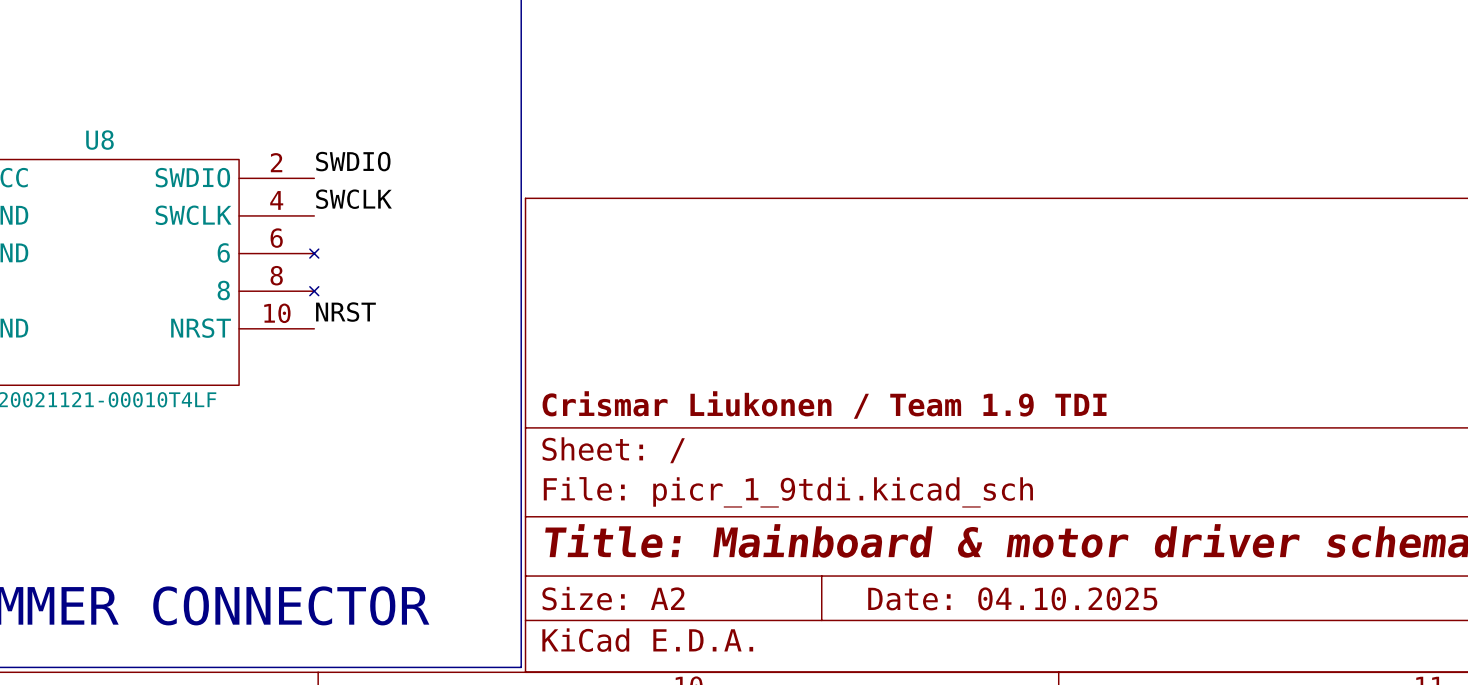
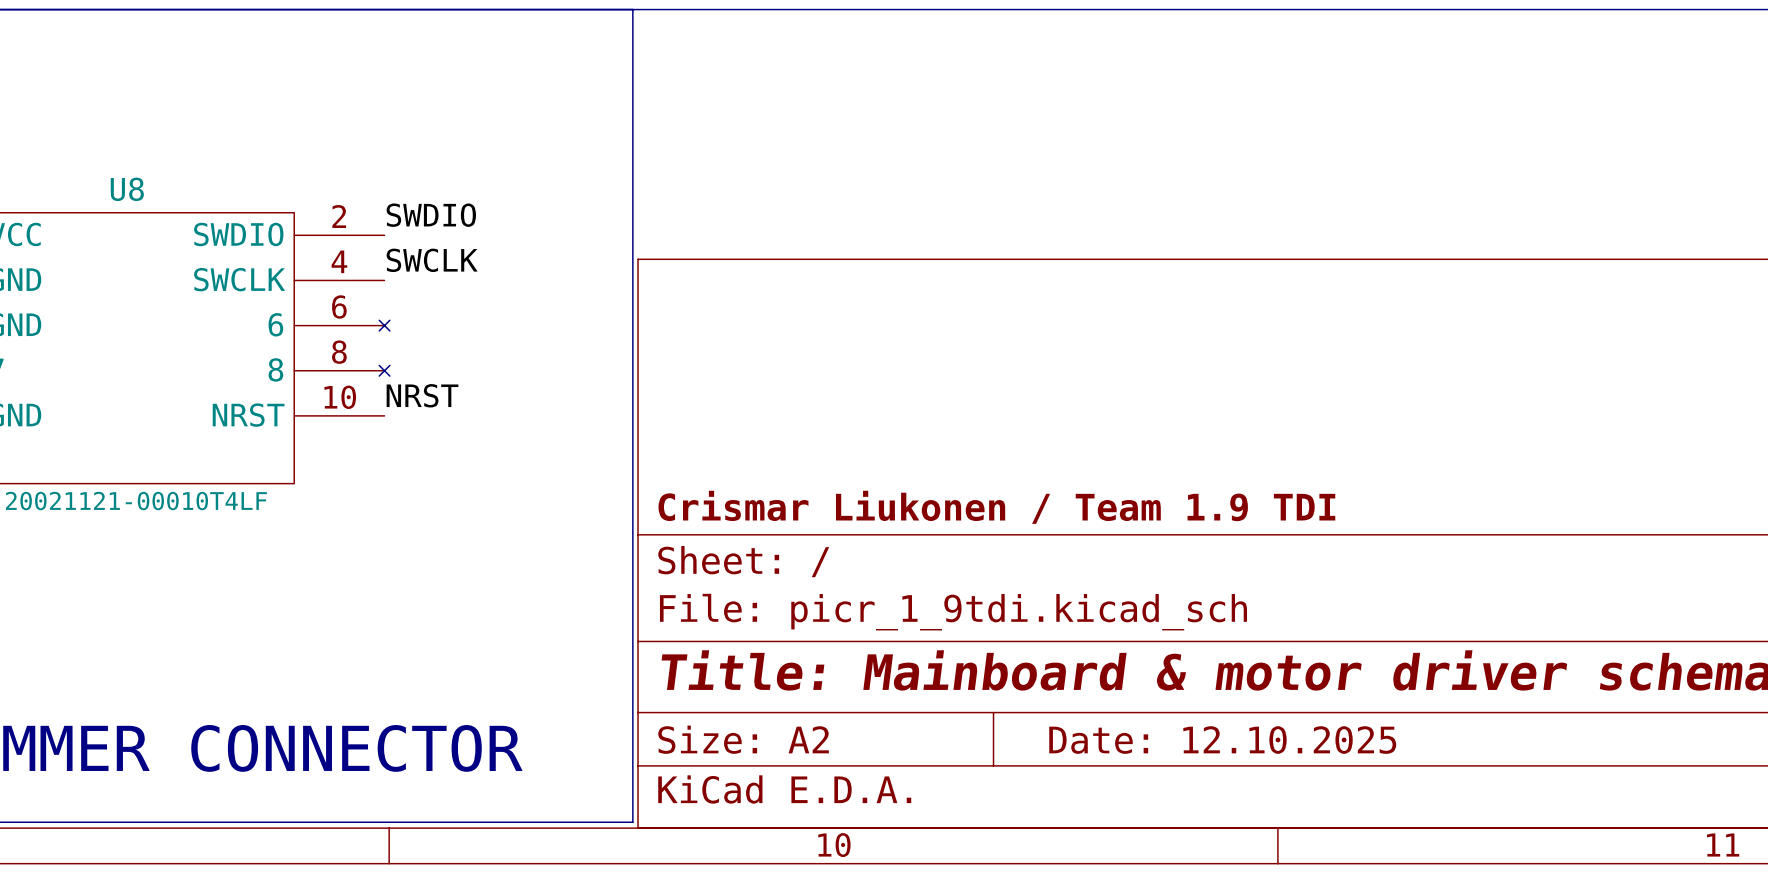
title block: Date: 04.10.2025 (1012, 598) -> Date: 12.10.2025 (1222, 740)

